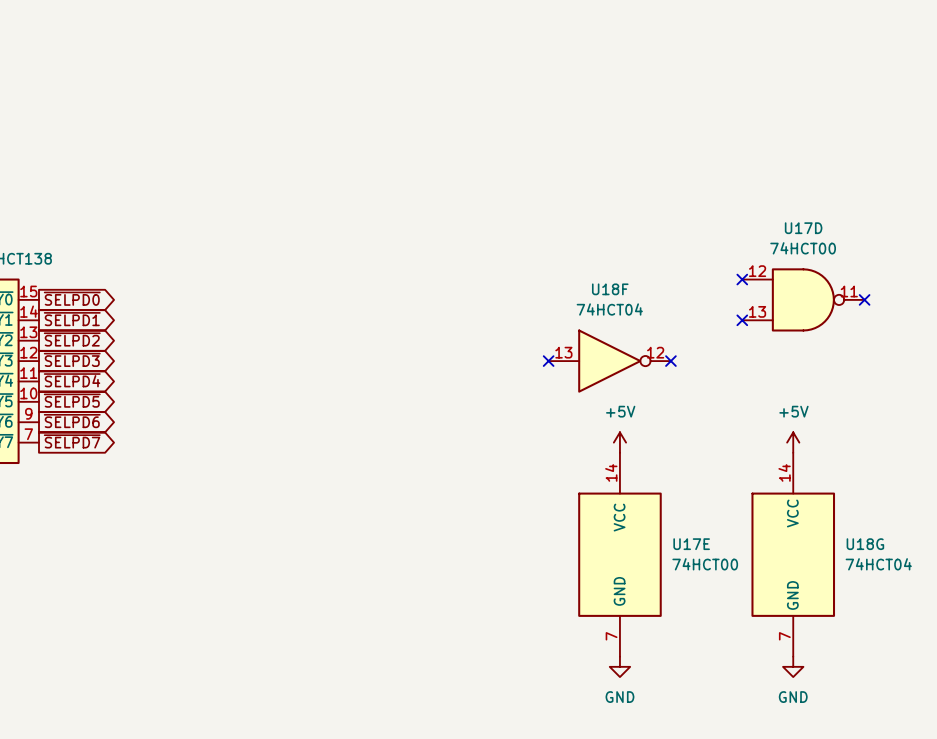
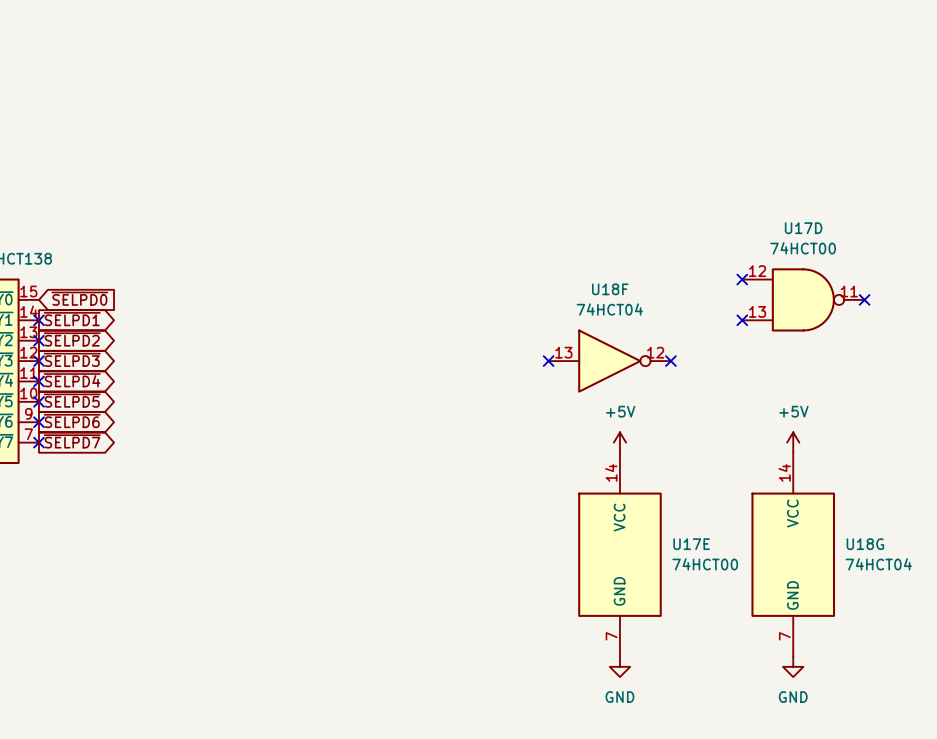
global label shape: output (72, 298) -> input (79, 298)
no-connect mark: none -> (38, 320)
no-connect mark: none -> (38, 340)
no-connect mark: none -> (38, 361)
no-connect mark: none -> (38, 381)
no-connect mark: none -> (38, 401)
no-connect mark: none -> (38, 422)
no-connect mark: none -> (38, 442)

